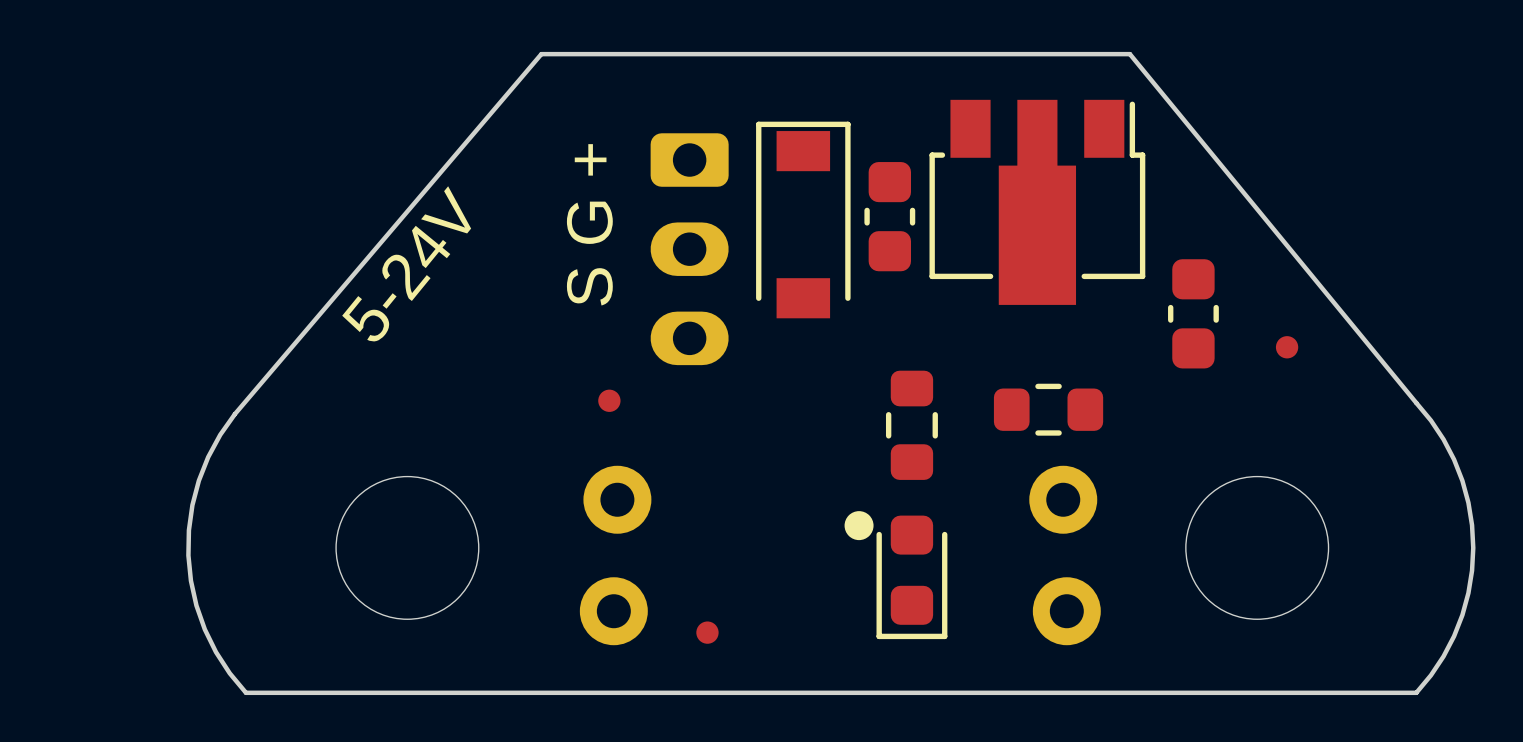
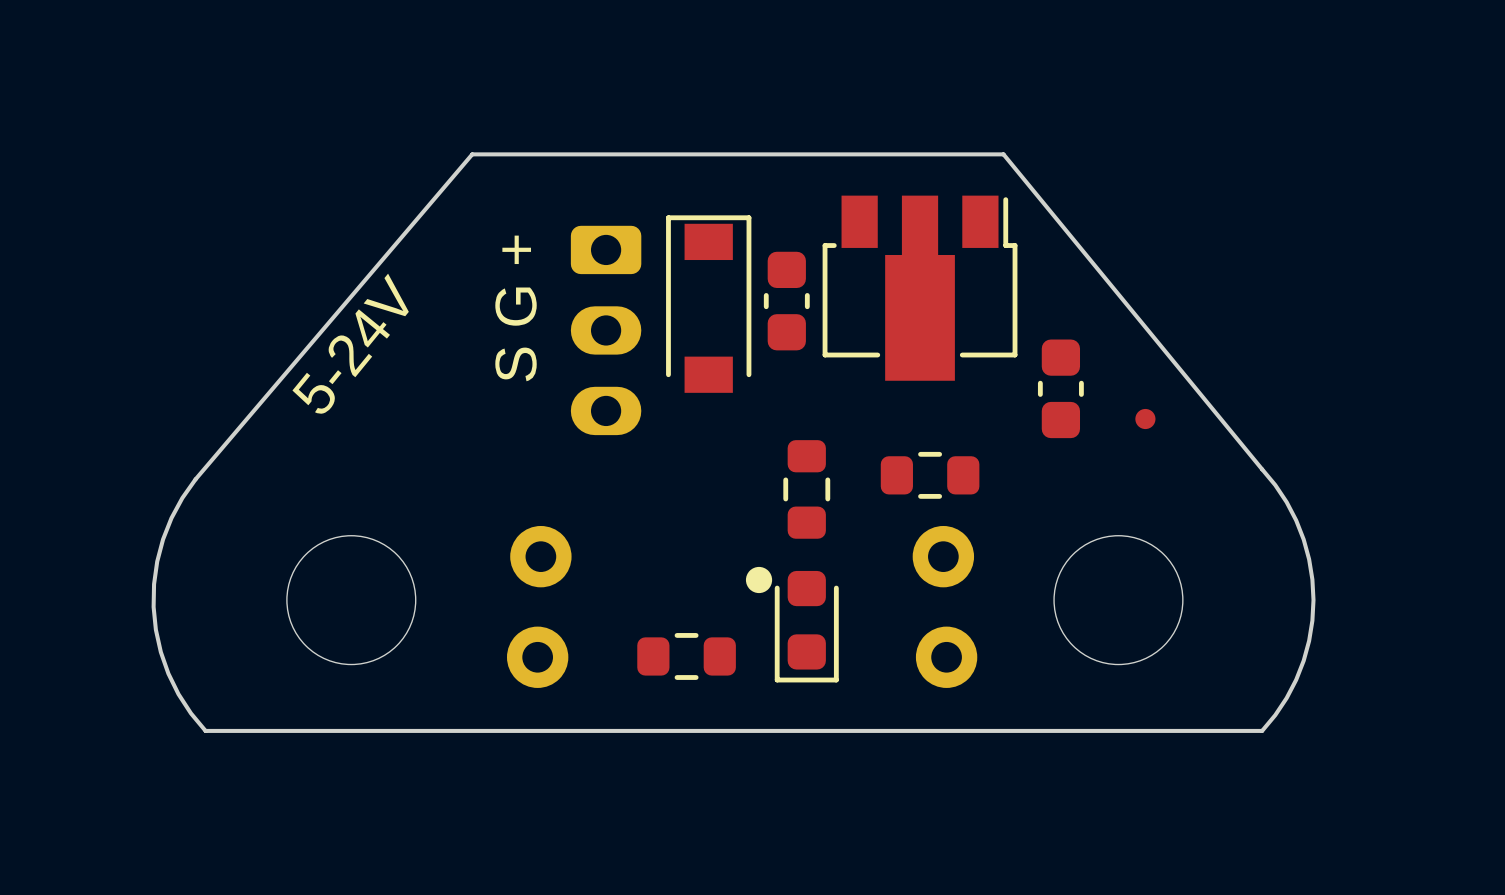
part: (609, 400) -> none
part: none -> (686, 656)
part: (707, 632) -> none

